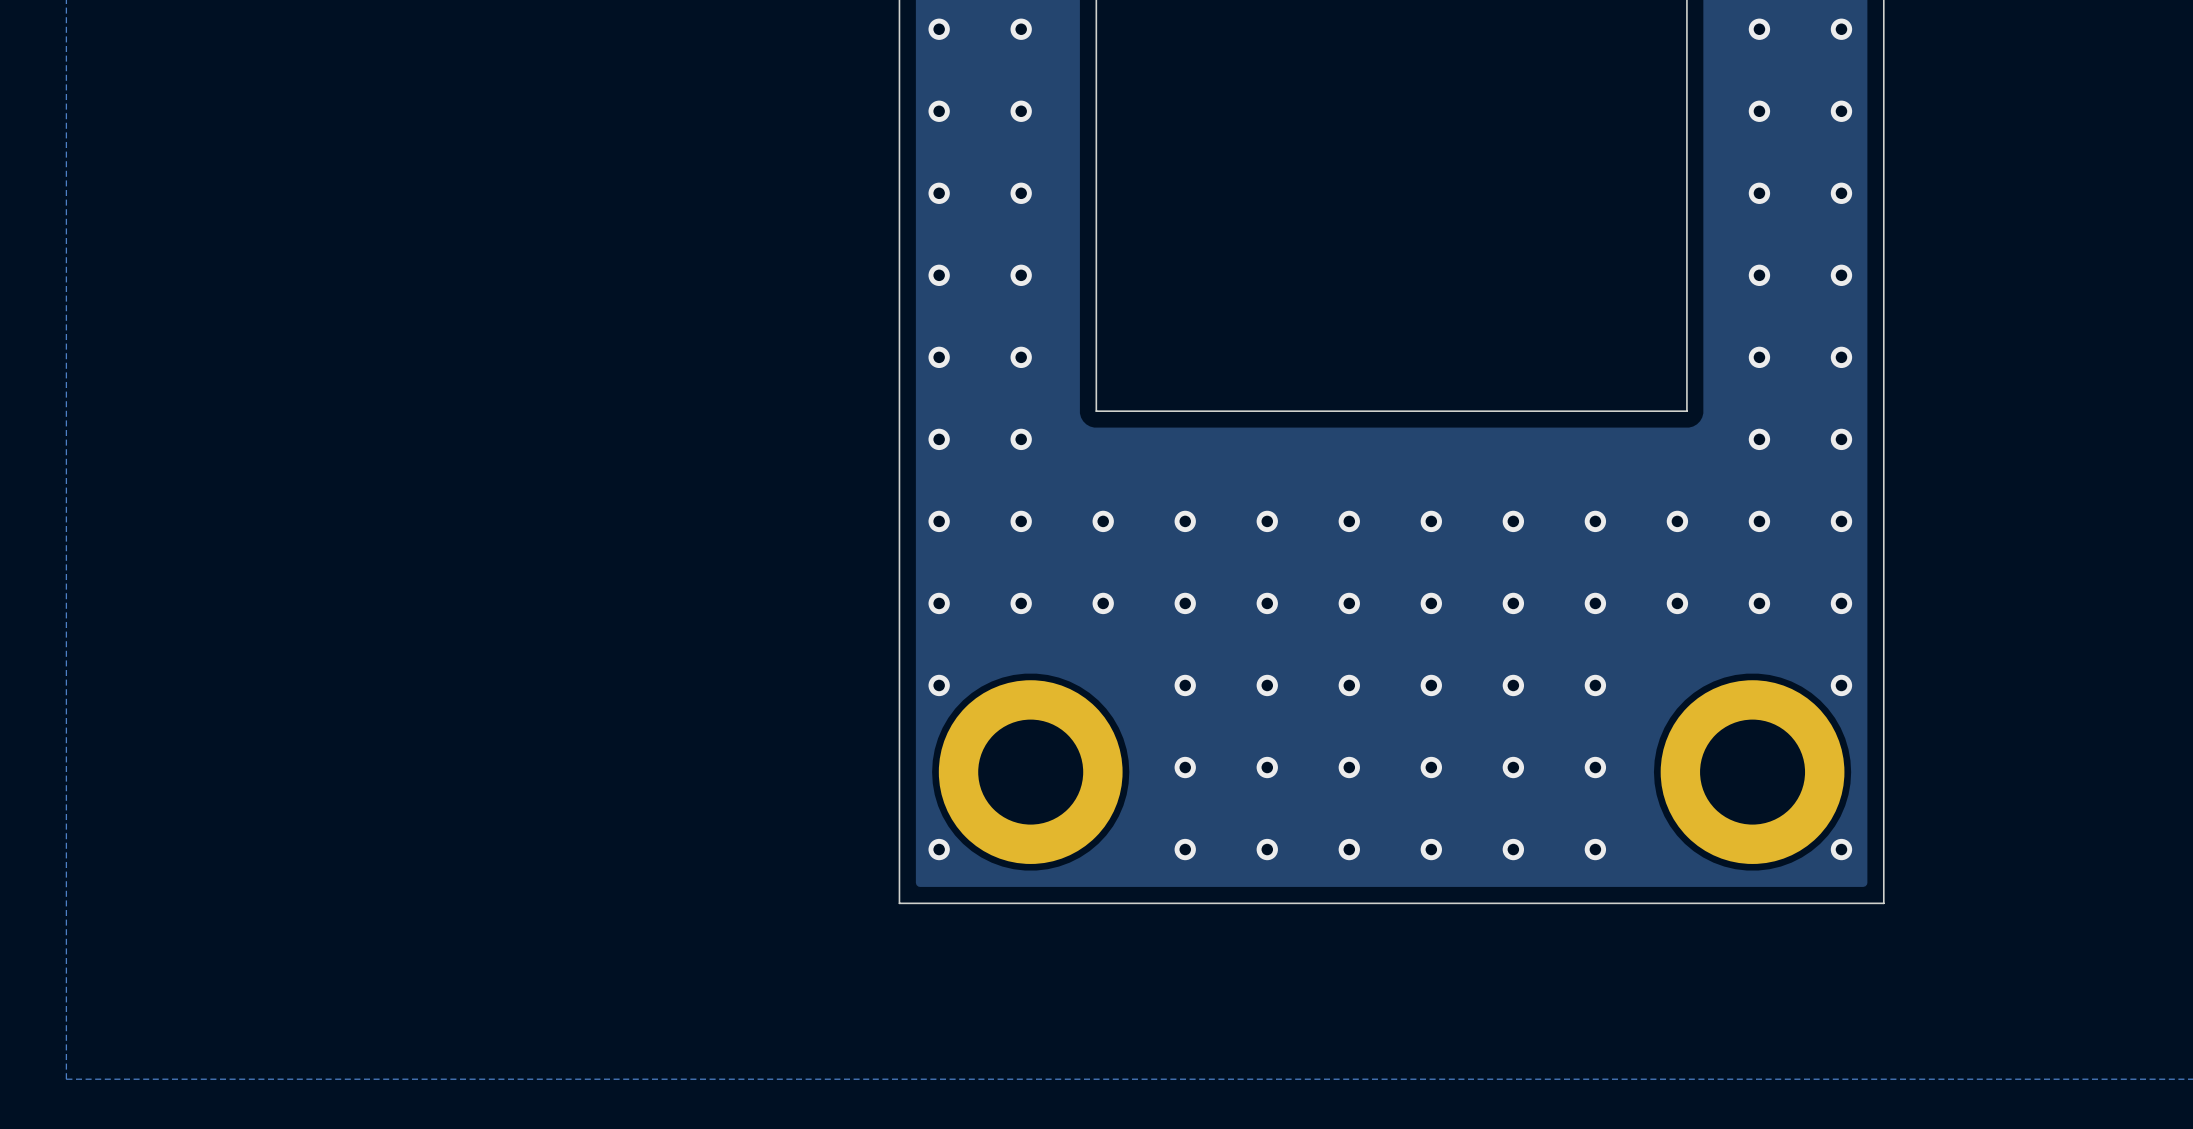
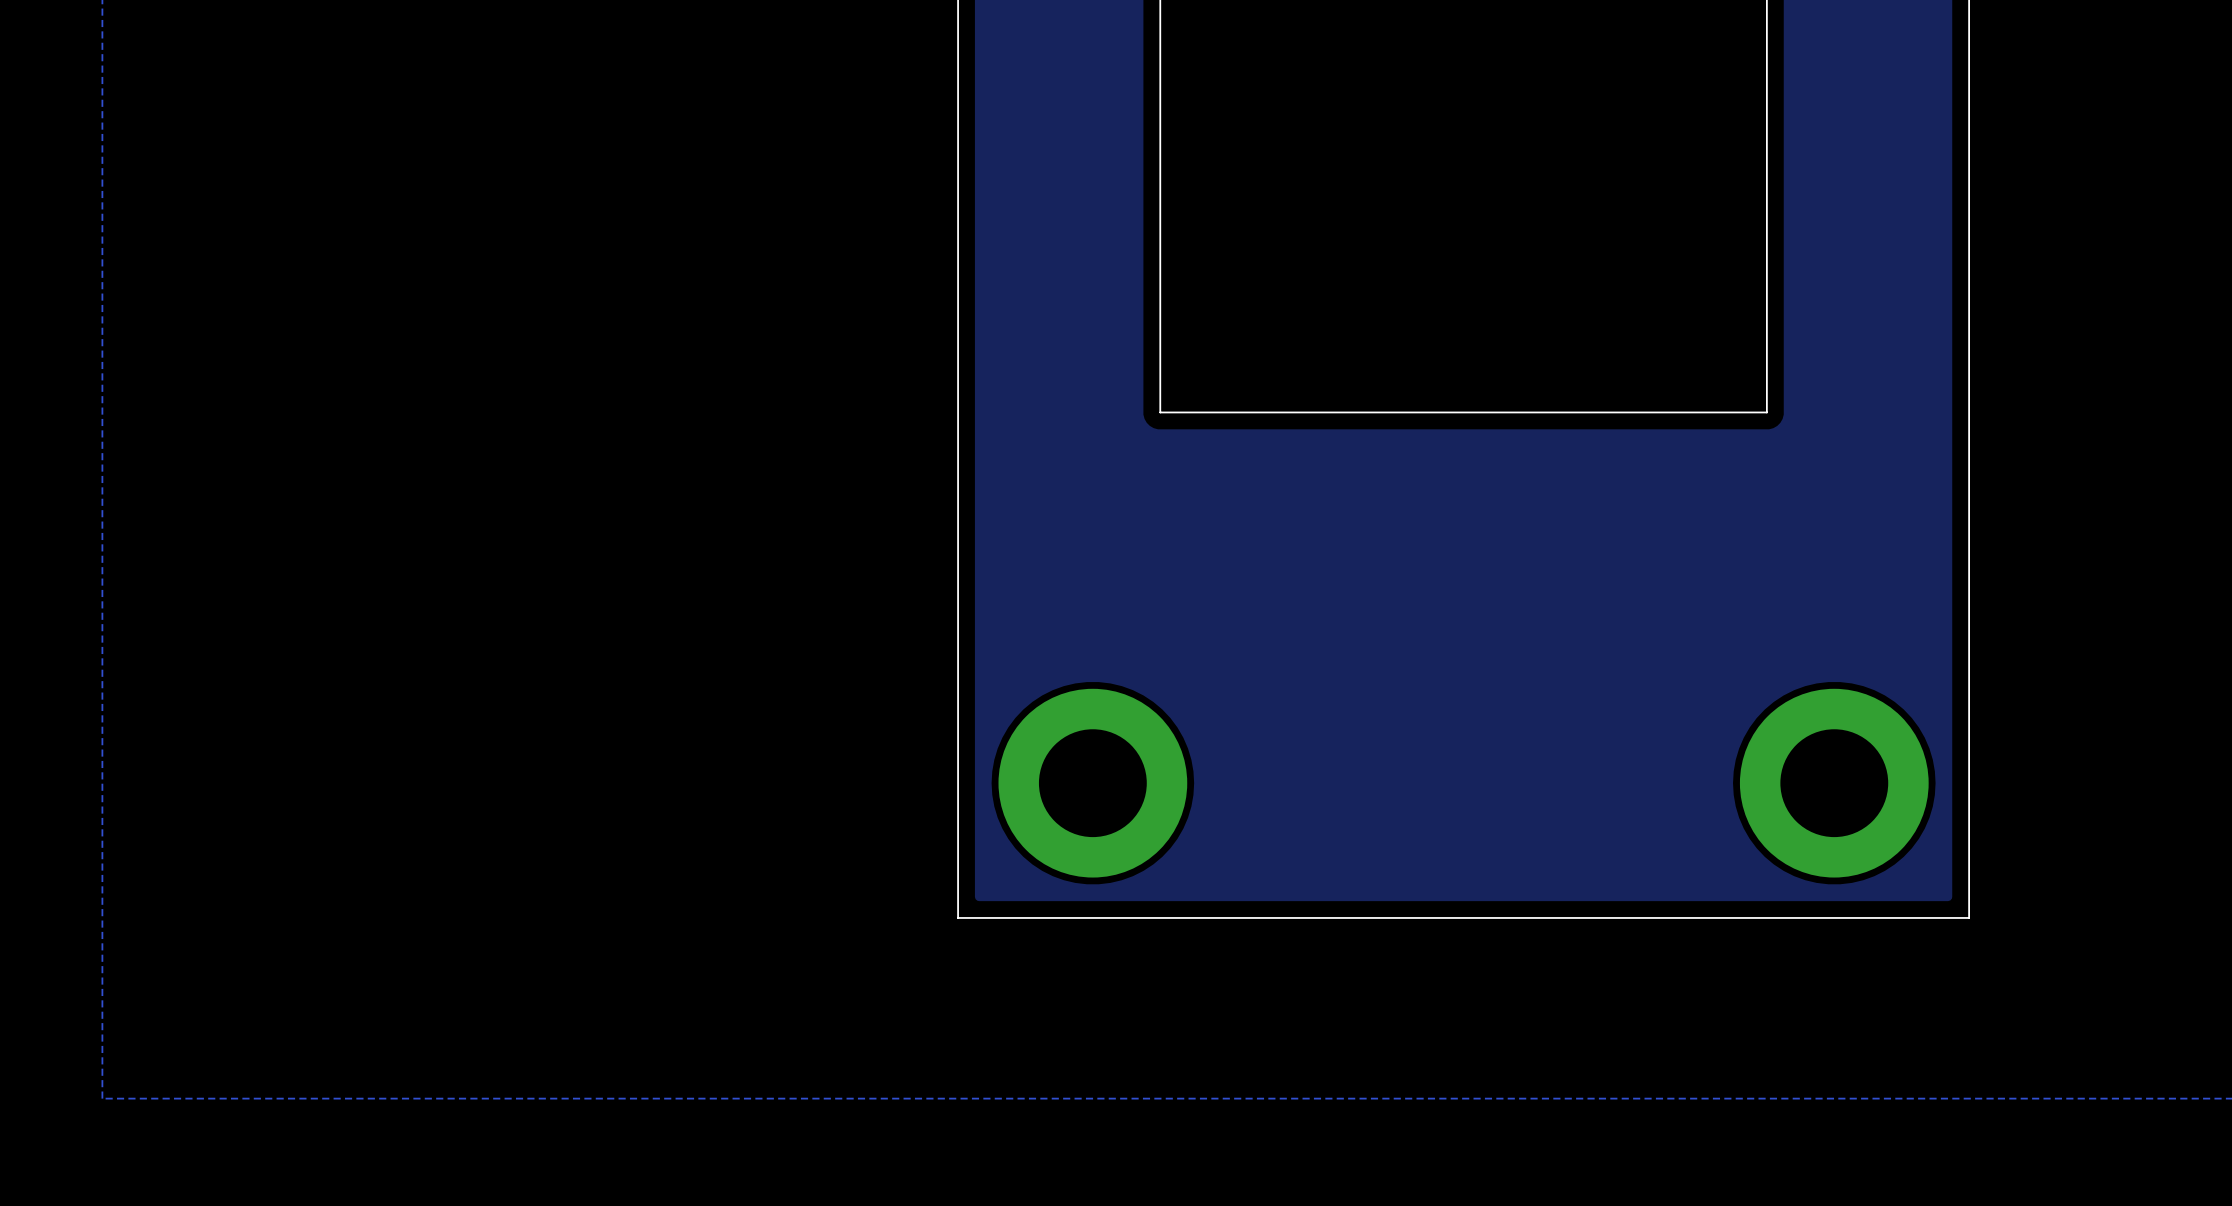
via: (939, 29) -> none
via: (1021, 29) -> none
via: (1759, 29) -> none
via: (1841, 29) -> none
via: (939, 111) -> none
via: (1021, 111) -> none
via: (1759, 111) -> none
via: (1841, 111) -> none
via: (939, 193) -> none
via: (1021, 193) -> none
via: (1759, 193) -> none
via: (1841, 193) -> none
via: (939, 275) -> none
via: (1021, 275) -> none
via: (1759, 275) -> none
via: (1841, 275) -> none
via: (939, 357) -> none
via: (1021, 357) -> none
via: (1759, 357) -> none
via: (1841, 357) -> none
via: (939, 439) -> none
via: (1021, 439) -> none
via: (1759, 439) -> none
via: (1841, 439) -> none
via: (939, 521) -> none
via: (1021, 521) -> none
via: (1103, 521) -> none
via: (1185, 521) -> none
via: (1267, 521) -> none
via: (1349, 521) -> none
via: (1431, 521) -> none
via: (1513, 521) -> none
via: (1595, 521) -> none
via: (1677, 521) -> none
via: (1759, 521) -> none
via: (1841, 521) -> none
via: (939, 603) -> none
via: (1021, 603) -> none
via: (1103, 603) -> none
via: (1185, 603) -> none
via: (1267, 603) -> none
via: (1349, 603) -> none
via: (1431, 603) -> none
via: (1513, 603) -> none
via: (1595, 603) -> none
via: (1677, 603) -> none
via: (1759, 603) -> none
via: (1841, 603) -> none
via: (939, 685) -> none
via: (1185, 685) -> none
via: (1267, 685) -> none
via: (1349, 685) -> none
via: (1431, 685) -> none
via: (1513, 685) -> none
via: (1595, 685) -> none
via: (1841, 685) -> none
via: (1185, 767) -> none
via: (1267, 767) -> none
via: (1349, 767) -> none
via: (1431, 767) -> none
via: (1513, 767) -> none
via: (1595, 767) -> none
via: (939, 849) -> none
via: (1185, 849) -> none
via: (1267, 849) -> none
via: (1349, 849) -> none
via: (1431, 849) -> none
via: (1513, 849) -> none
via: (1595, 849) -> none
via: (1841, 849) -> none

